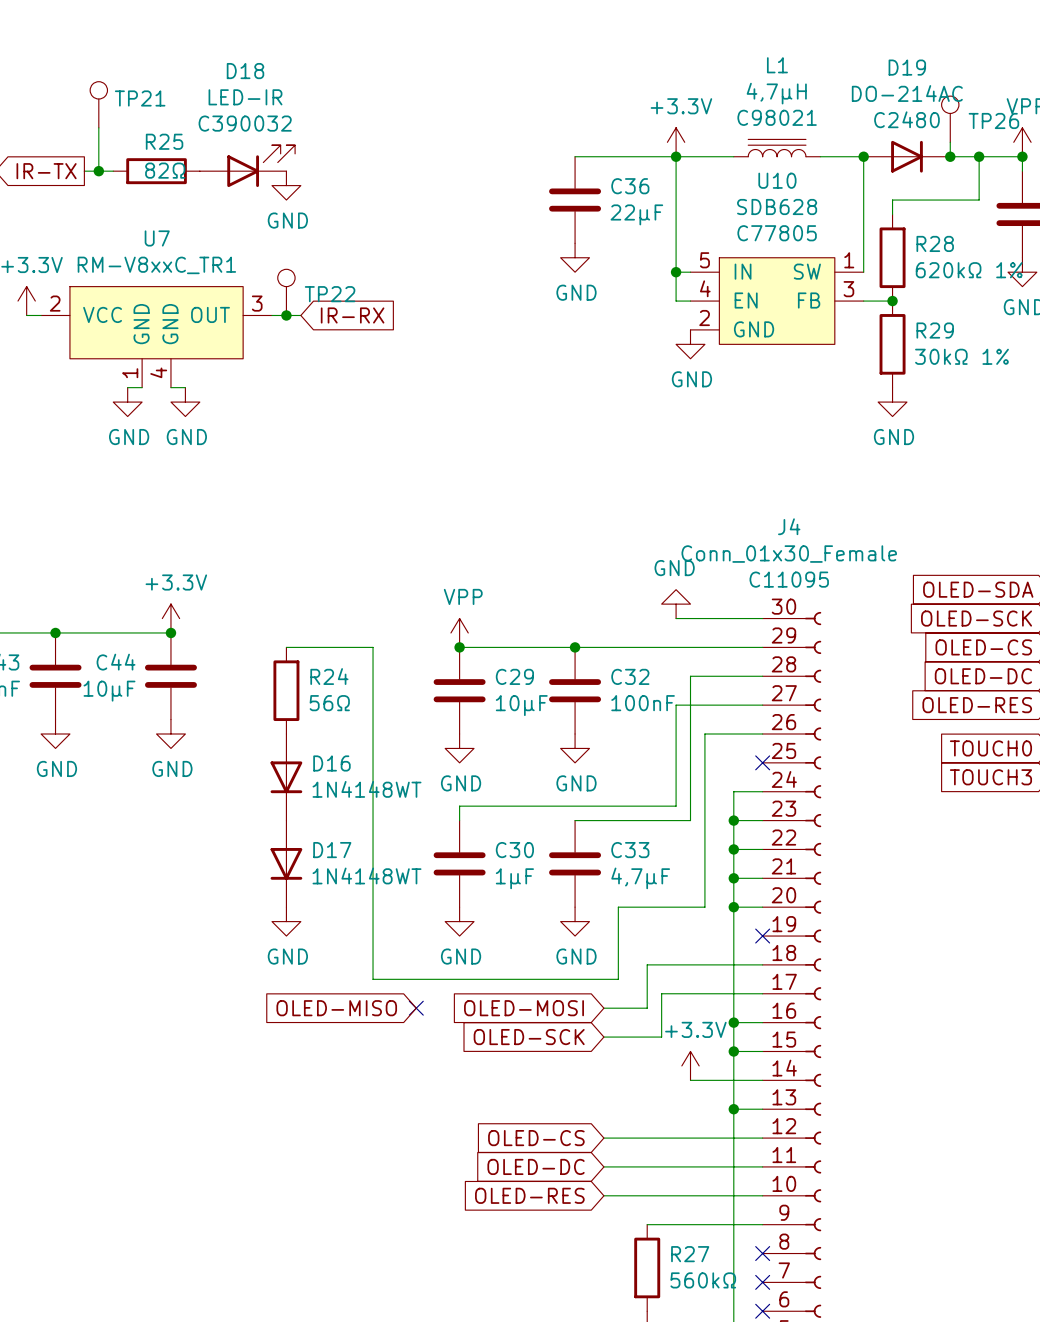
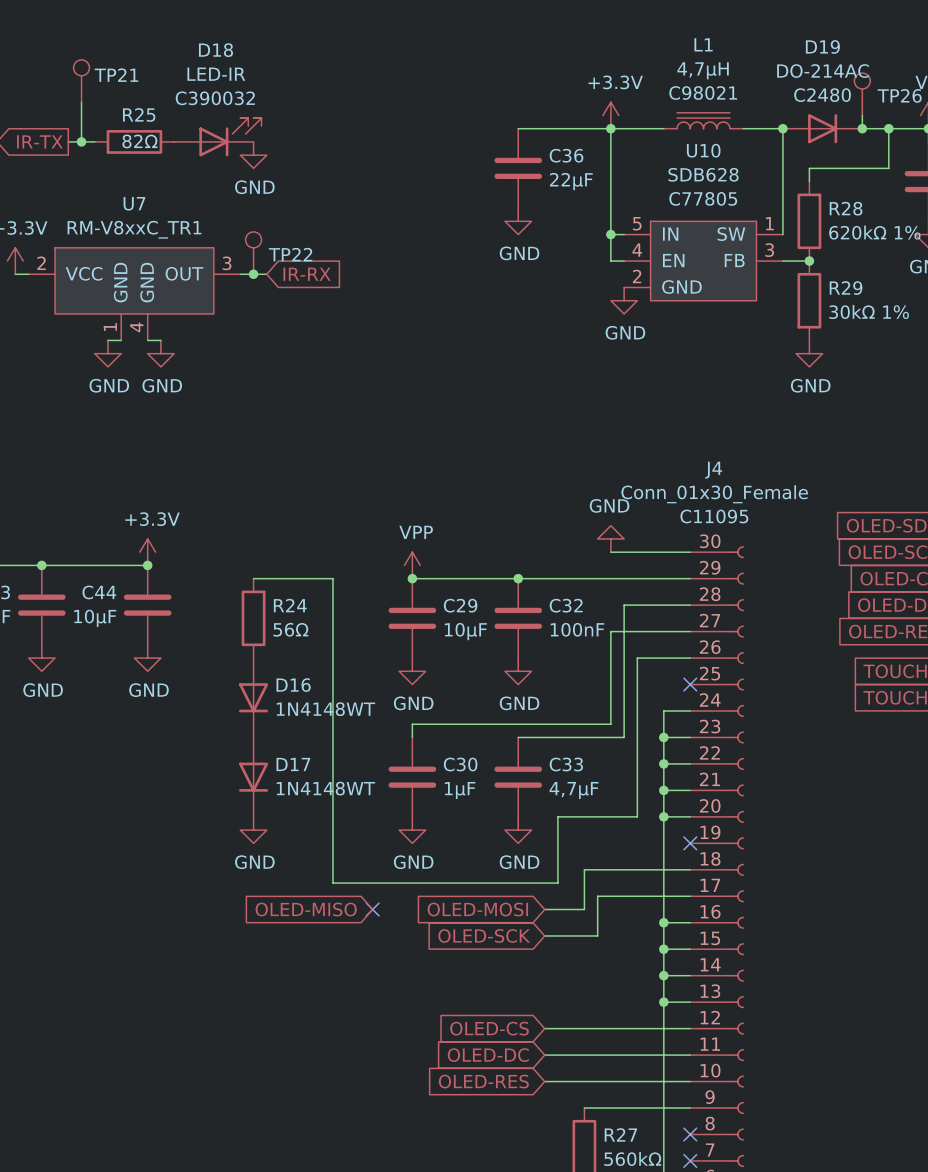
power symbol: +3.3V (690, 1065) -> none
wire: (690, 1080) (733, 1080) -> none
junction: none -> (663, 975)

